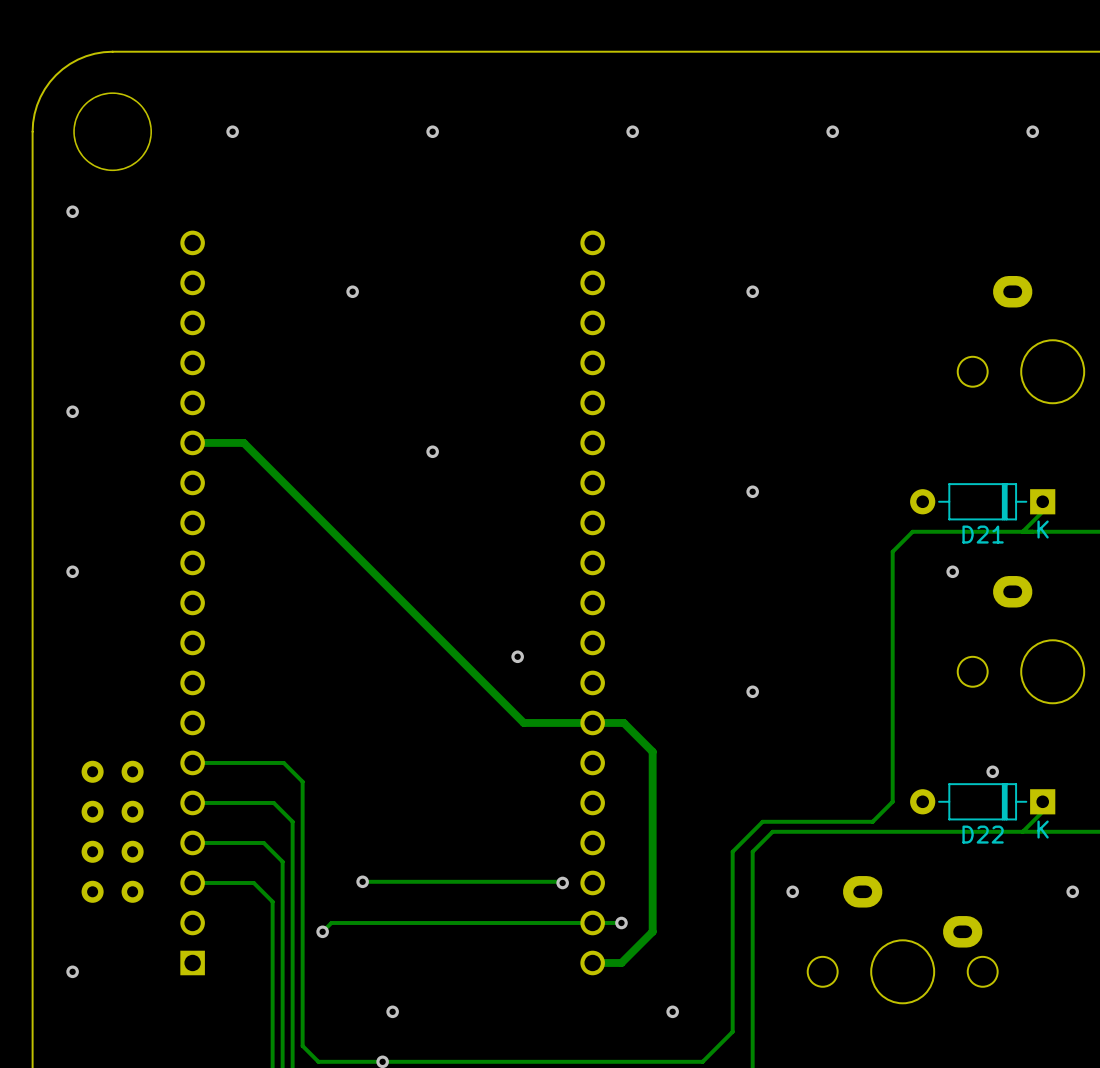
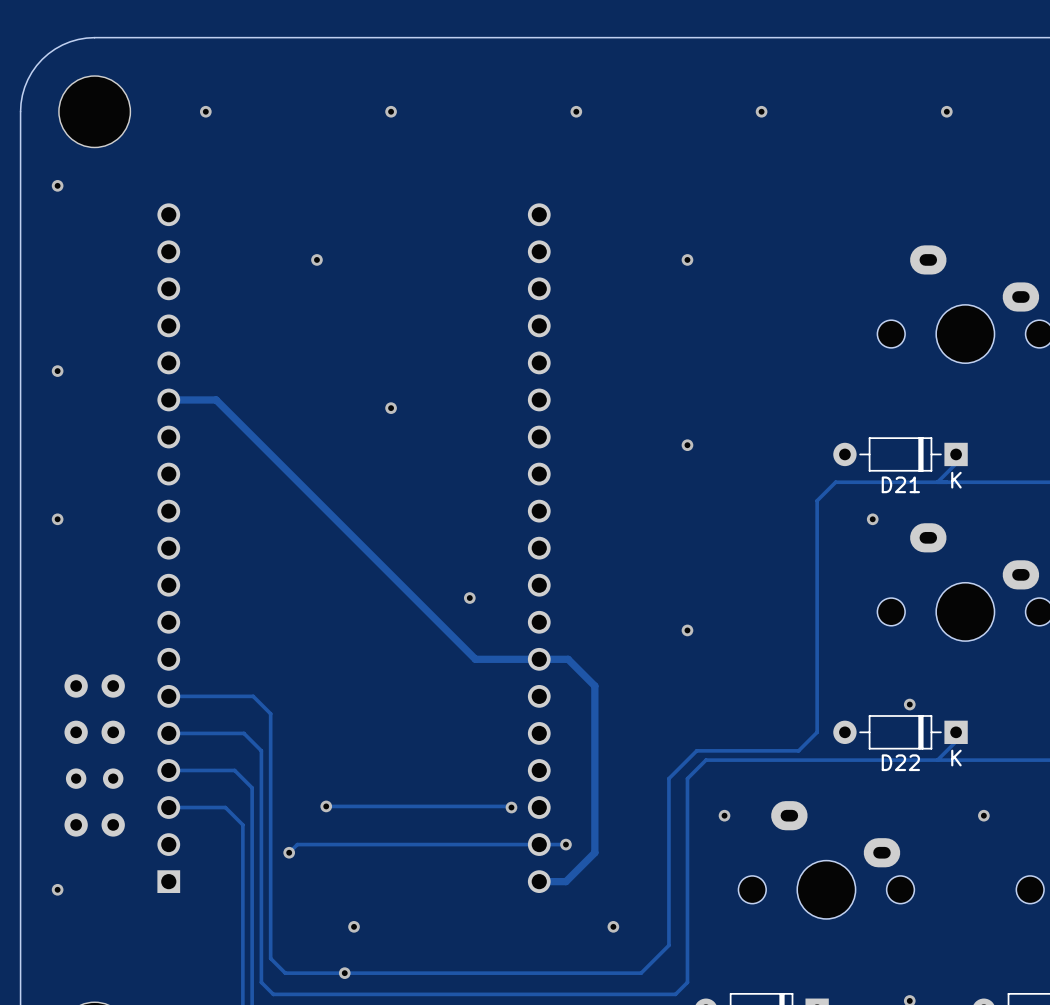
part: none -> (94, 686)
part: (112, 771) -> none
part footprint: [81, 800, 144, 823] -> [64, 720, 125, 745]
part footprint: [81, 880, 144, 903] -> [64, 813, 125, 837]

